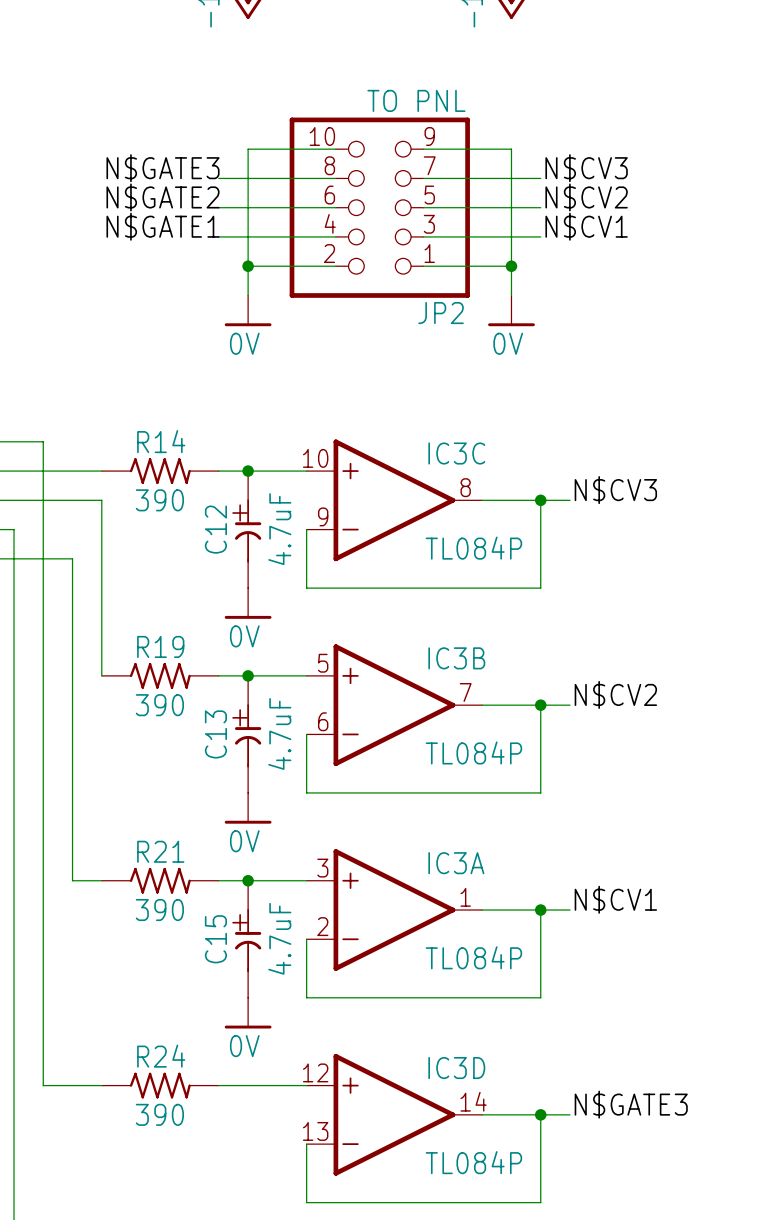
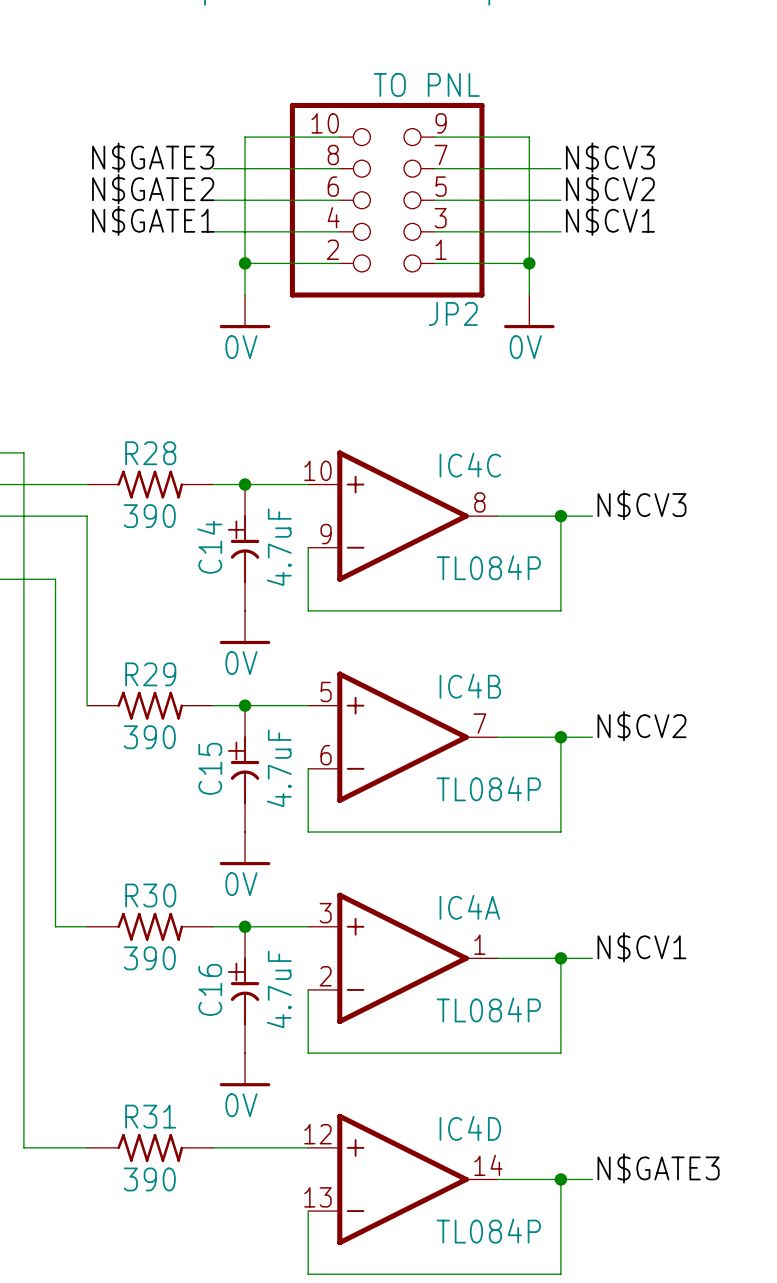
R14 name: R14 (161, 441) -> R28 (150, 453)
IC3C name: IC3C (456, 453) -> IC4C (470, 465)
C12 name: C12 (215, 529) -> C14 (209, 547)
R19 name: R19 (160, 646) -> R29 (150, 674)
IC3B name: IC3B (456, 658) -> IC4B (470, 686)
C13 name: C13 (215, 734) -> C15 (210, 768)
R21 name: R21 (160, 851) -> R30 (150, 895)
IC3A name: IC3A (456, 863) -> IC4A (469, 907)
C15 name: C15 (215, 939) -> C16 (210, 989)
R24 name: R24 (161, 1056) -> R31 (150, 1116)
IC3D name: IC3D (456, 1068) -> IC4D (470, 1128)

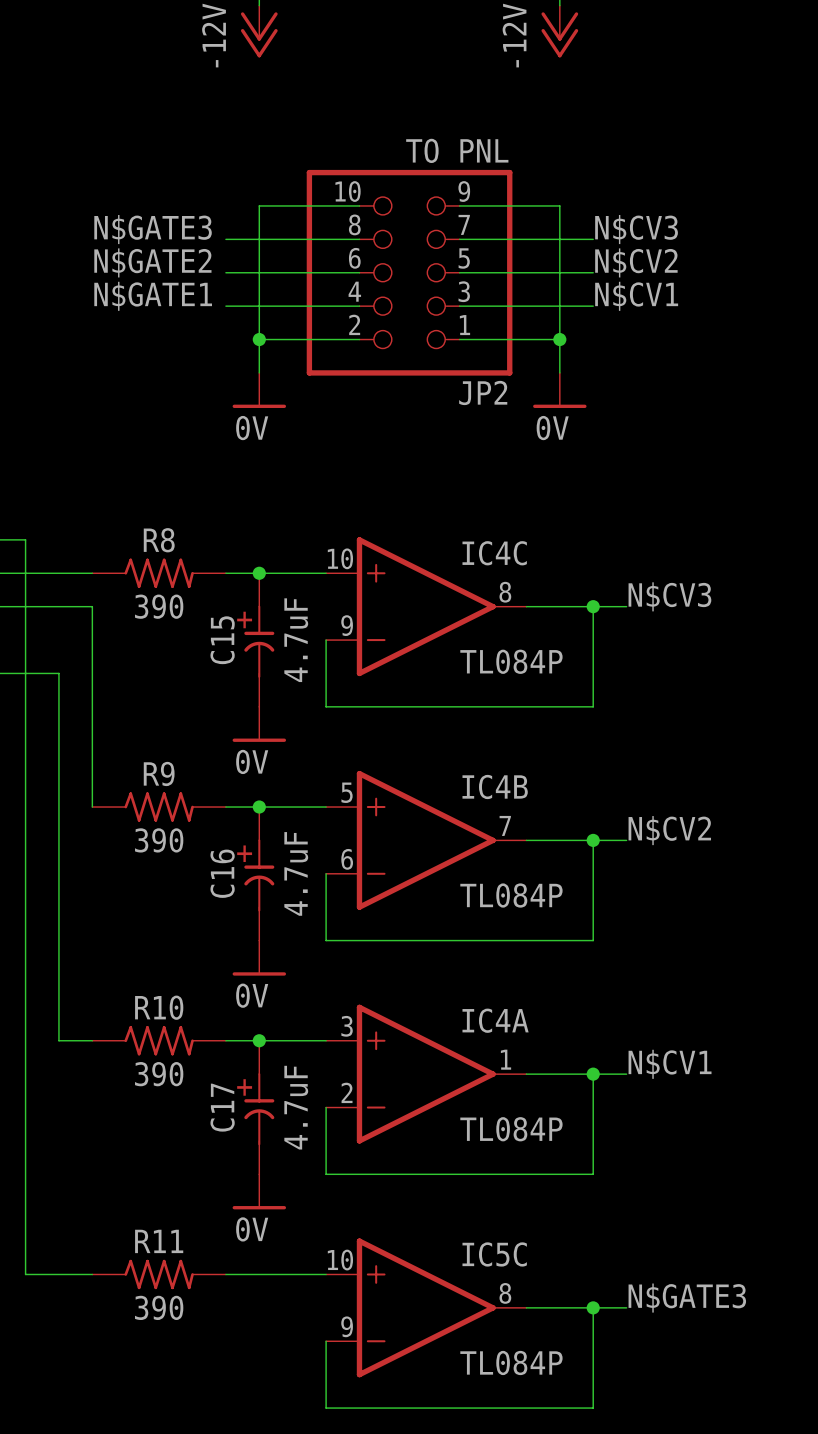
R28 name: R28 (150, 453) -> R8 (159, 540)
C14 name: C14 (209, 547) -> C15 (222, 640)
R29 name: R29 (150, 674) -> R9 (159, 773)
C15 name: C15 (210, 768) -> C16 (222, 873)
R30 name: R30 (150, 895) -> R10 (159, 1007)
C16 name: C16 (210, 989) -> C17 (222, 1107)
R31 name: R31 (150, 1116) -> R11 (159, 1241)
IC4D name: IC4D (470, 1128) -> IC5C (494, 1254)
IC4D pin number: 12 (317, 1134) -> 10 (340, 1260)
IC4D pin number: 14 (488, 1165) -> 8 (505, 1293)
IC4D pin number: 13 (317, 1197) -> 9 (347, 1326)

